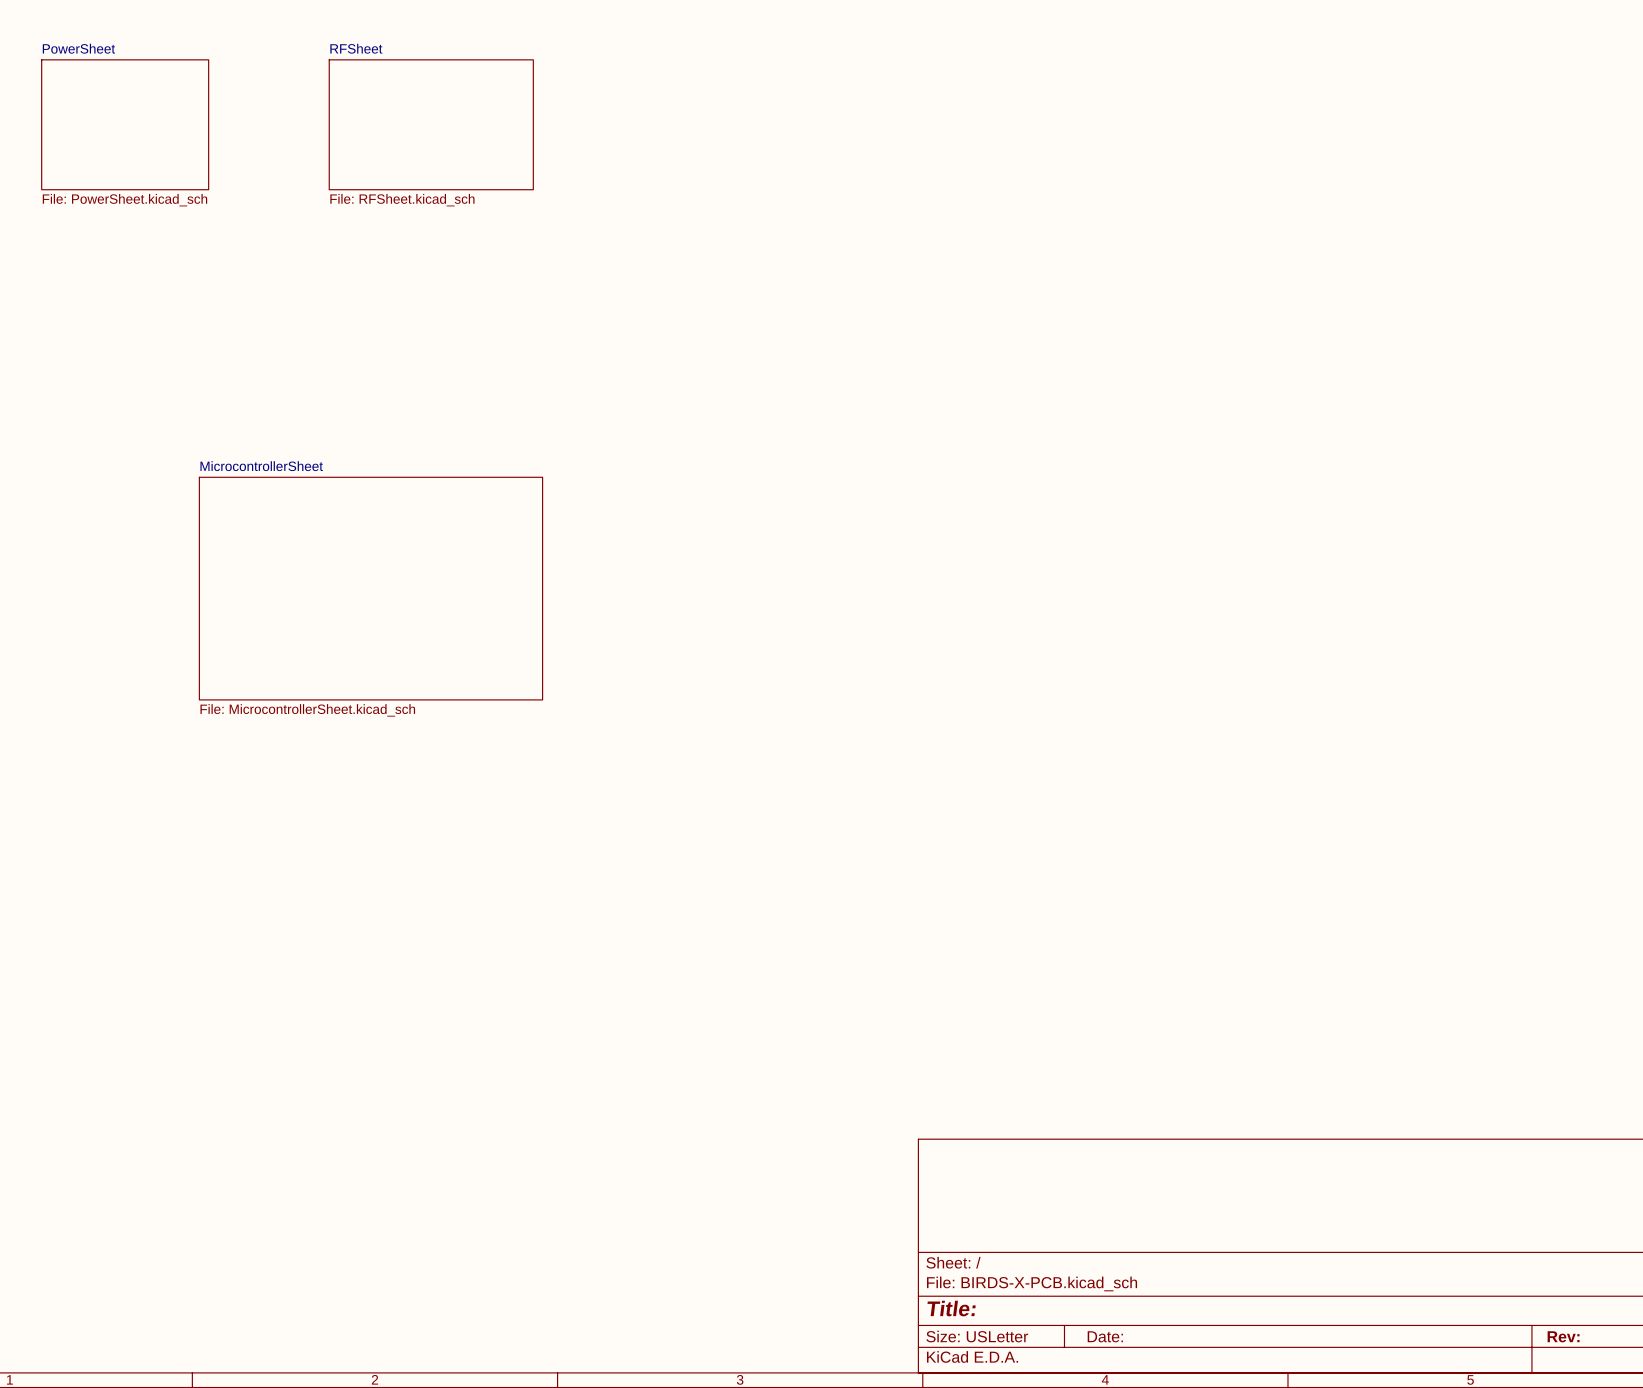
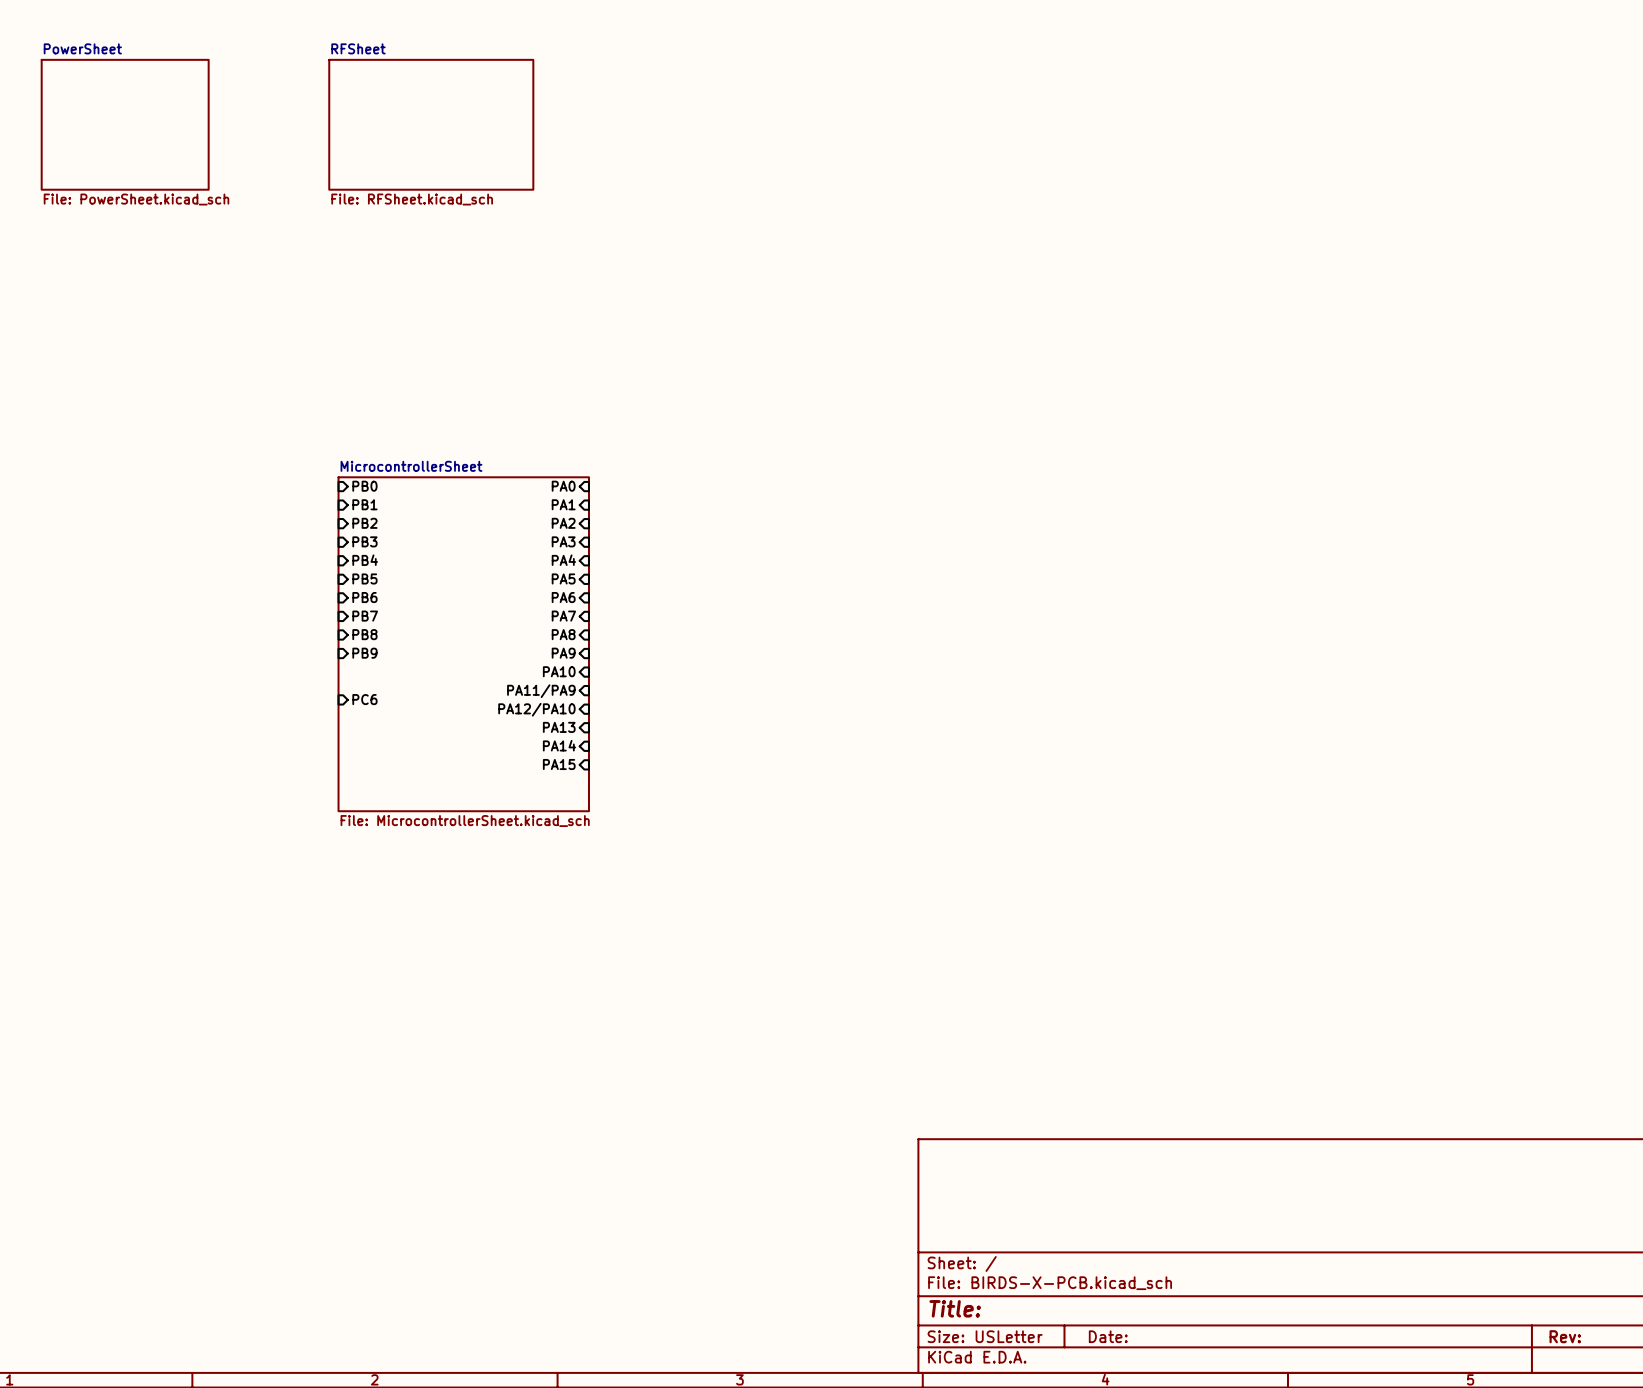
sheet pin: none -> PB0 (364, 486)
sheet pin: none -> PA0 (563, 486)
sheet pin: none -> PB1 (364, 504)
sheet pin: none -> PA1 (563, 504)
sheet pin: none -> PB2 (364, 523)
sheet pin: none -> PA2 (563, 523)
sheet pin: none -> PB3 (364, 541)
sheet pin: none -> PA3 (563, 541)
sheet pin: none -> PB4 (365, 560)
sheet pin: none -> PA4 (563, 560)
sheet pin: none -> PB5 (364, 578)
sheet pin: none -> PA5 (563, 578)
sheet MicrocontrollerSheet: File: MicrocontrollerSheet.kicad_sch (370, 588) -> none
sheet pin: none -> PB6 (364, 597)
sheet pin: none -> PA6 (563, 597)
sheet pin: none -> PB7 (365, 616)
sheet pin: none -> PA7 (563, 616)
sheet pin: none -> PB8 (364, 634)
sheet pin: none -> PA8 (563, 634)
sheet MicrocontrollerSheet: none -> File: MicrocontrollerSheet.kicad_sch (463, 644)
sheet pin: none -> PB9 (364, 653)
sheet pin: none -> PA9 (563, 653)
sheet pin: none -> PA10 (559, 671)
sheet pin: none -> PA11/PA9 (541, 691)
sheet pin: none -> PC6 (364, 699)
sheet pin: none -> PA12/PA10 (536, 709)
sheet pin: none -> PA13 (559, 727)
sheet pin: none -> PA14 (559, 745)
sheet pin: none -> PA15 (559, 764)

